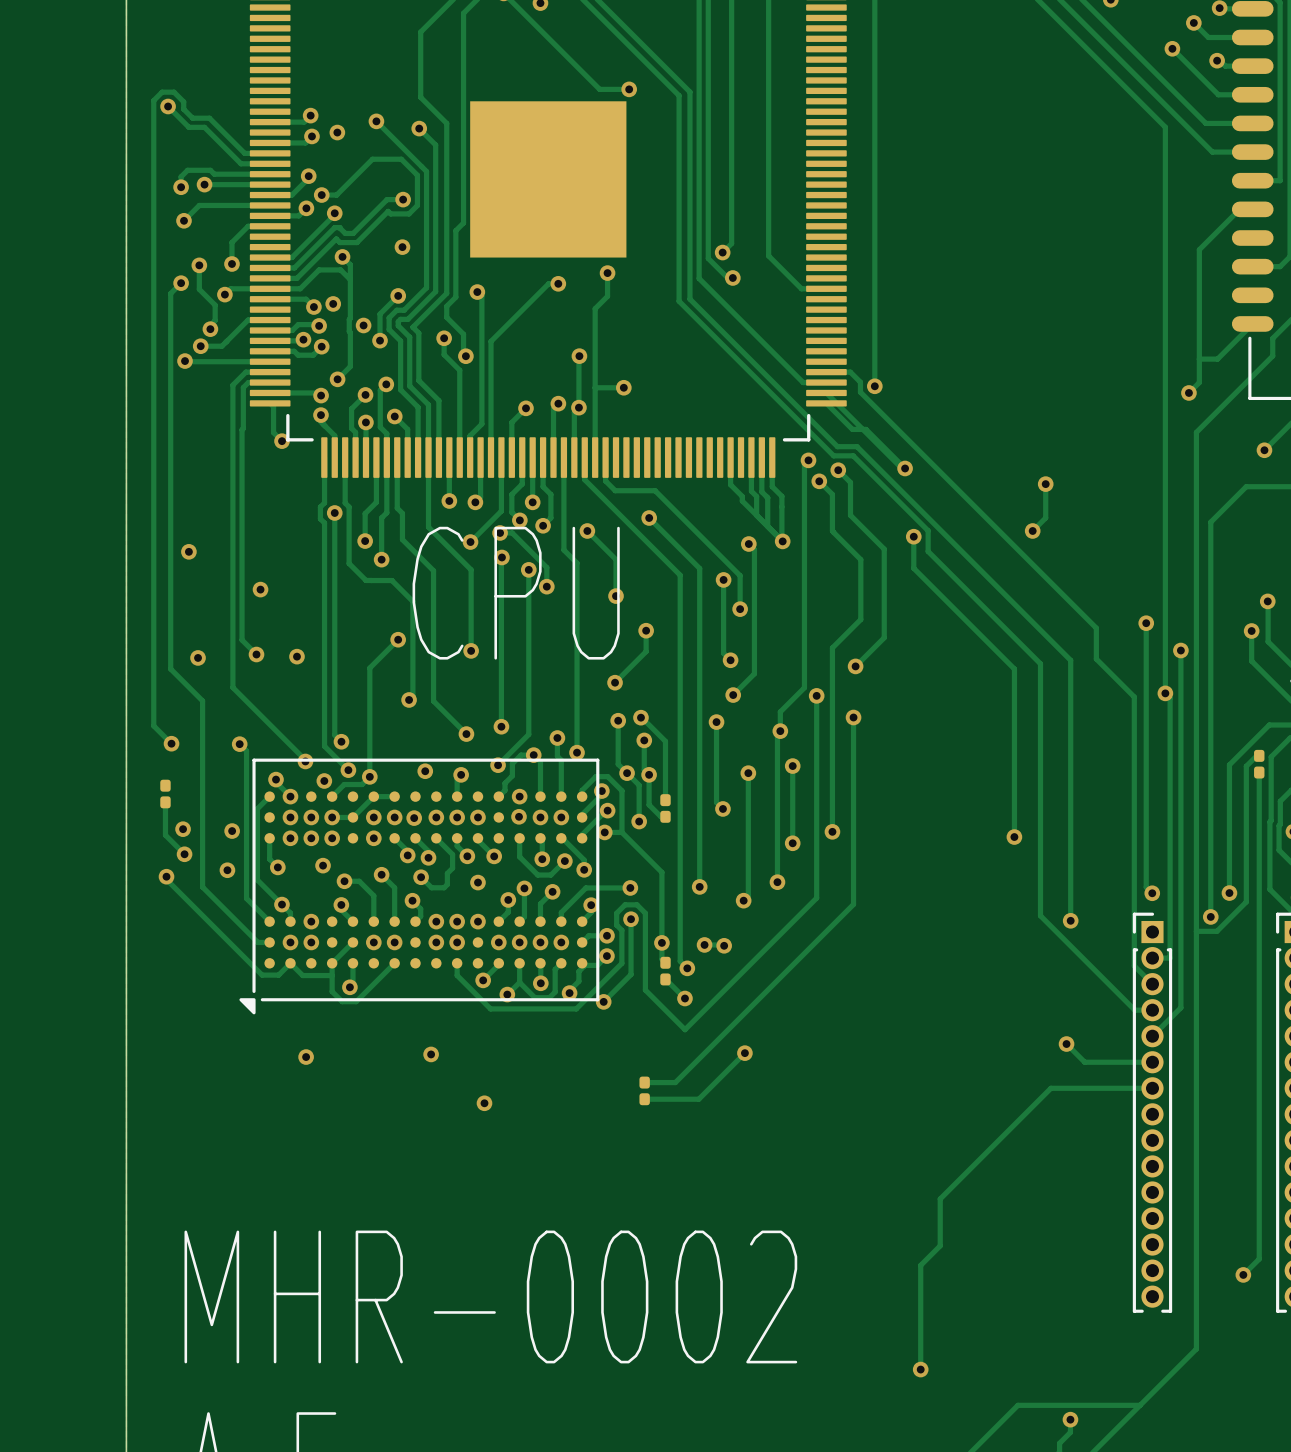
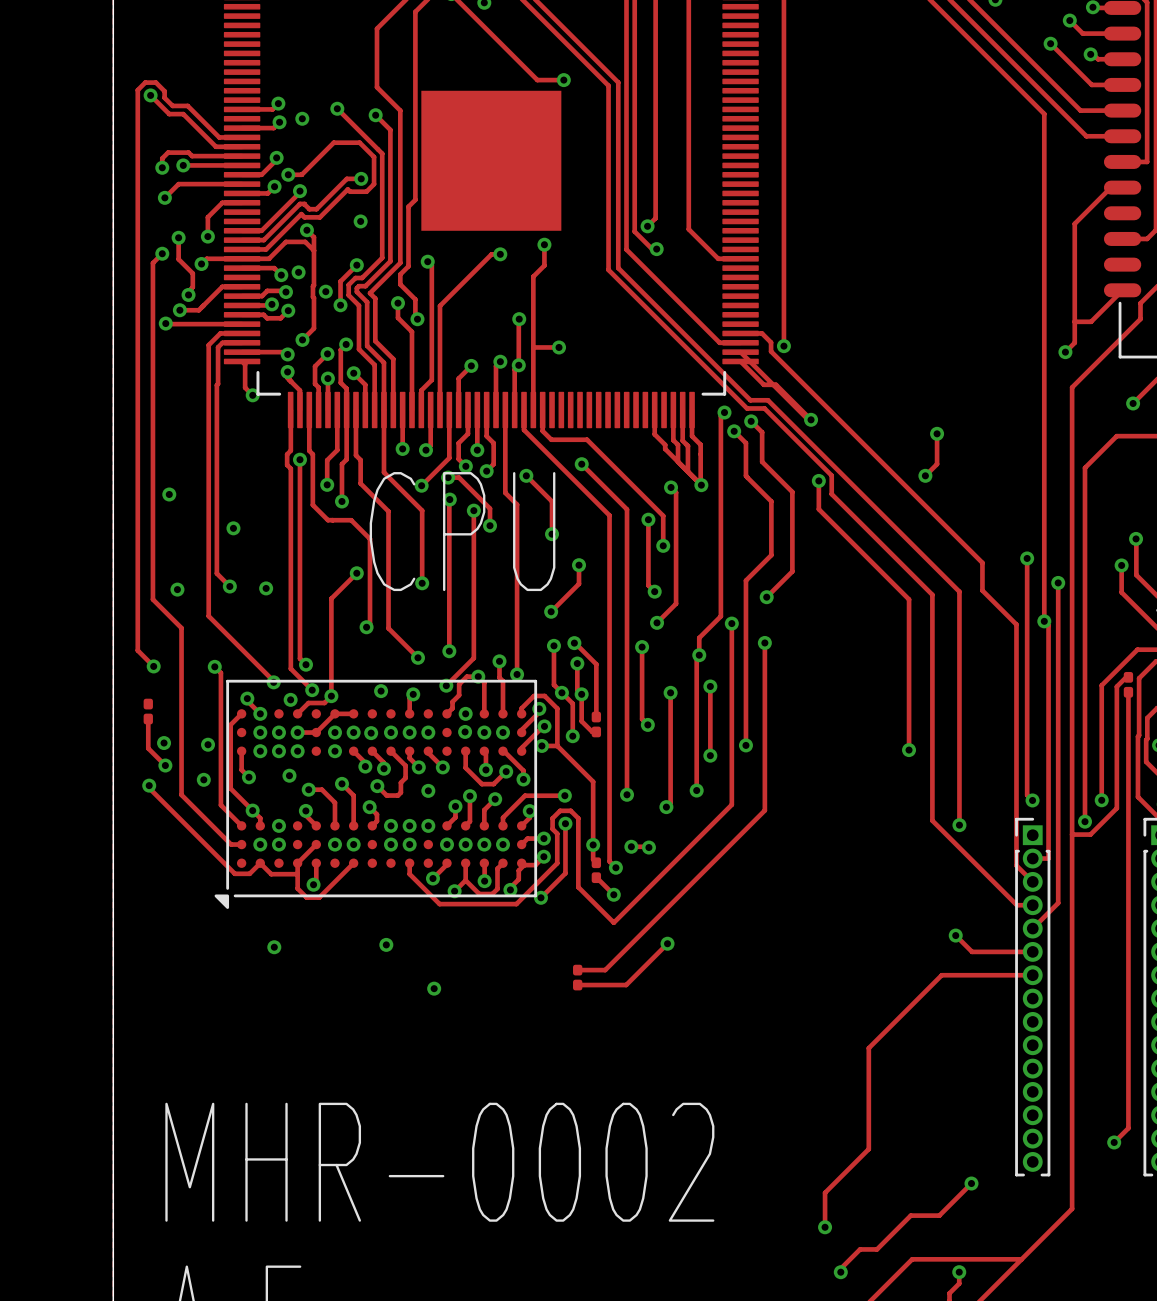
track: (969, 1169) (940, 1198) (940, 1245) (920, 1265) (920, 1331) -> (868, 1048) (868, 1149) (825, 1192)
track: none -> (971, 1183) (939, 1215) (910, 1215) (876, 1249) (860, 1249) (840, 1268) (840, 1271)
via: none -> (971, 1183)
via: none -> (840, 1272)

